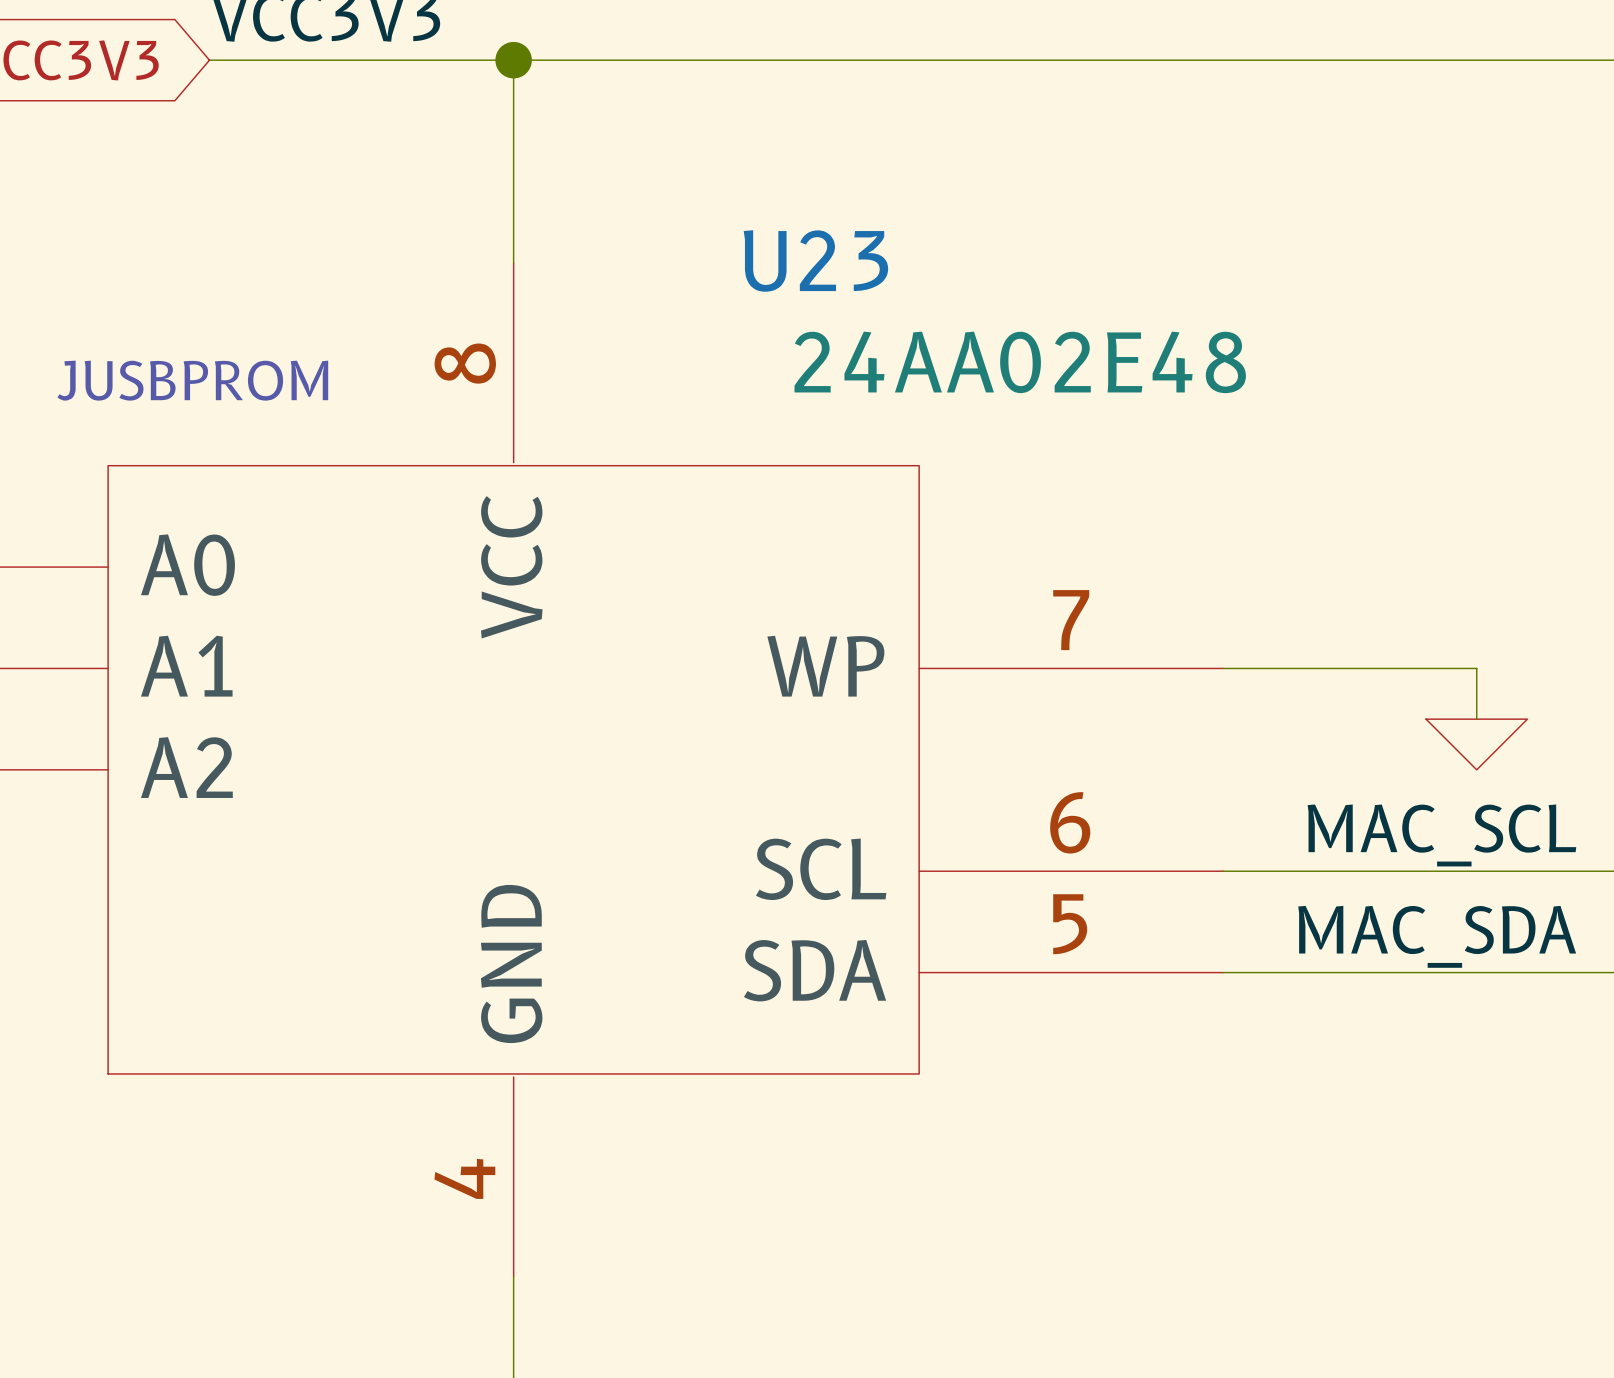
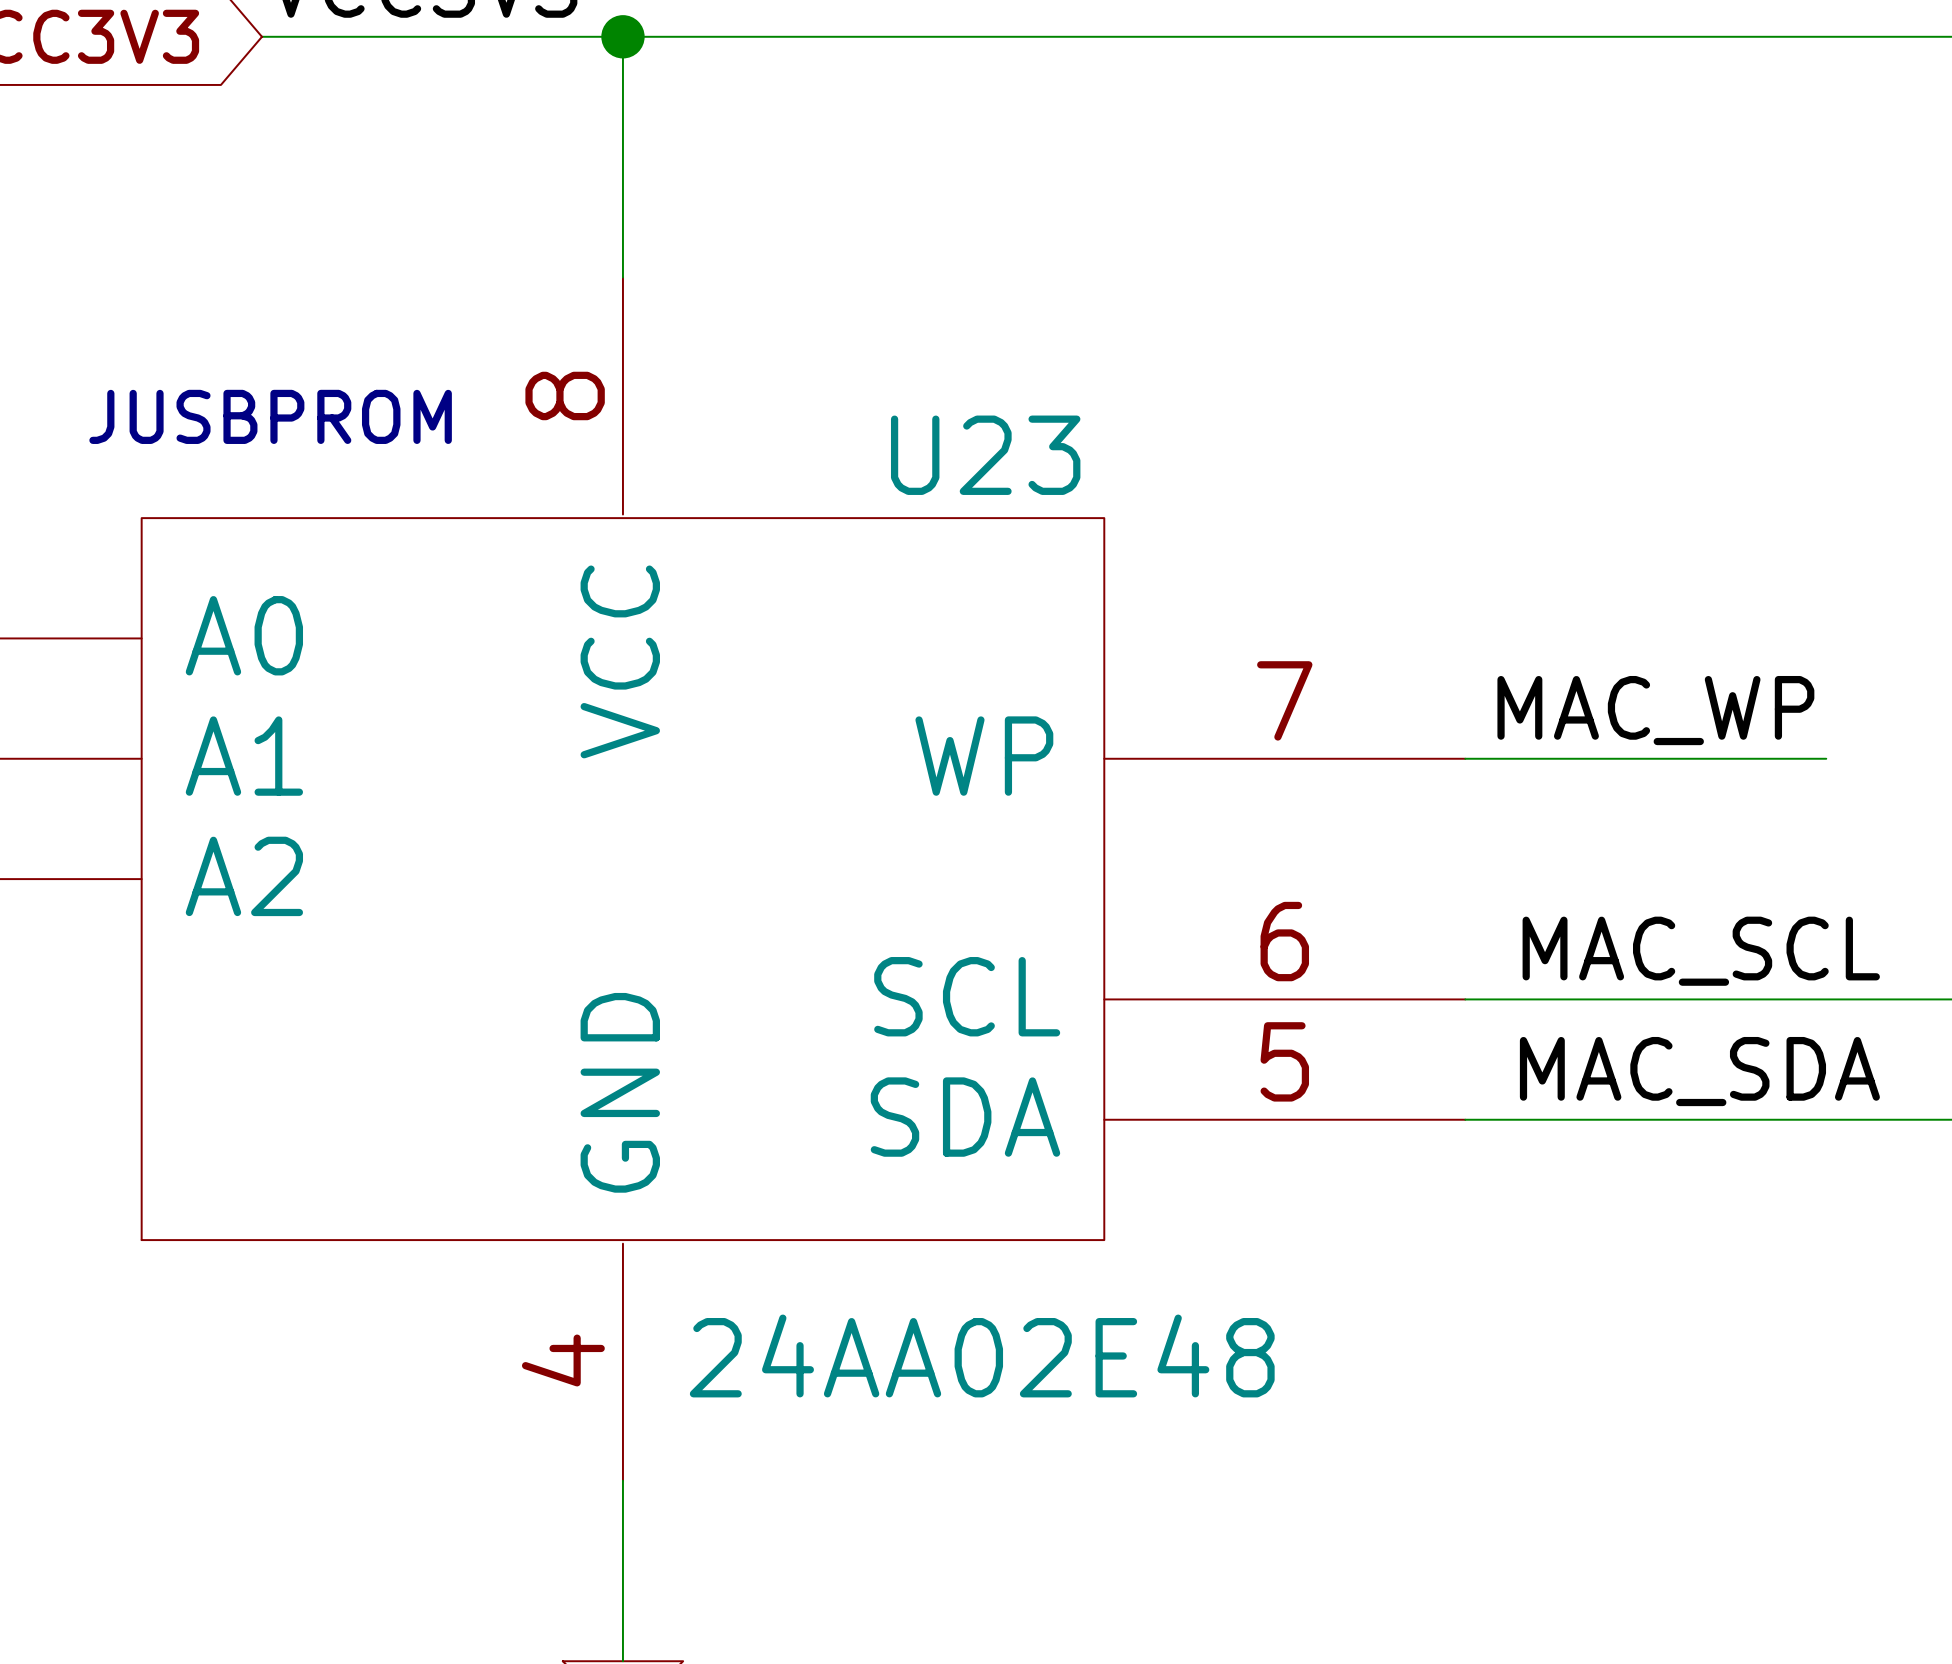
U23 name position: U23 (815, 260) -> U23 (985, 455)
U23 value position: 24AA02E48 (1020, 362) -> 24AA02E48 (982, 1355)
label: none -> MAC_WP (1655, 710)
wire: (1476, 668) (1476, 719) -> (1766, 758) (1826, 758)
power symbol: (1476, 744) -> none

